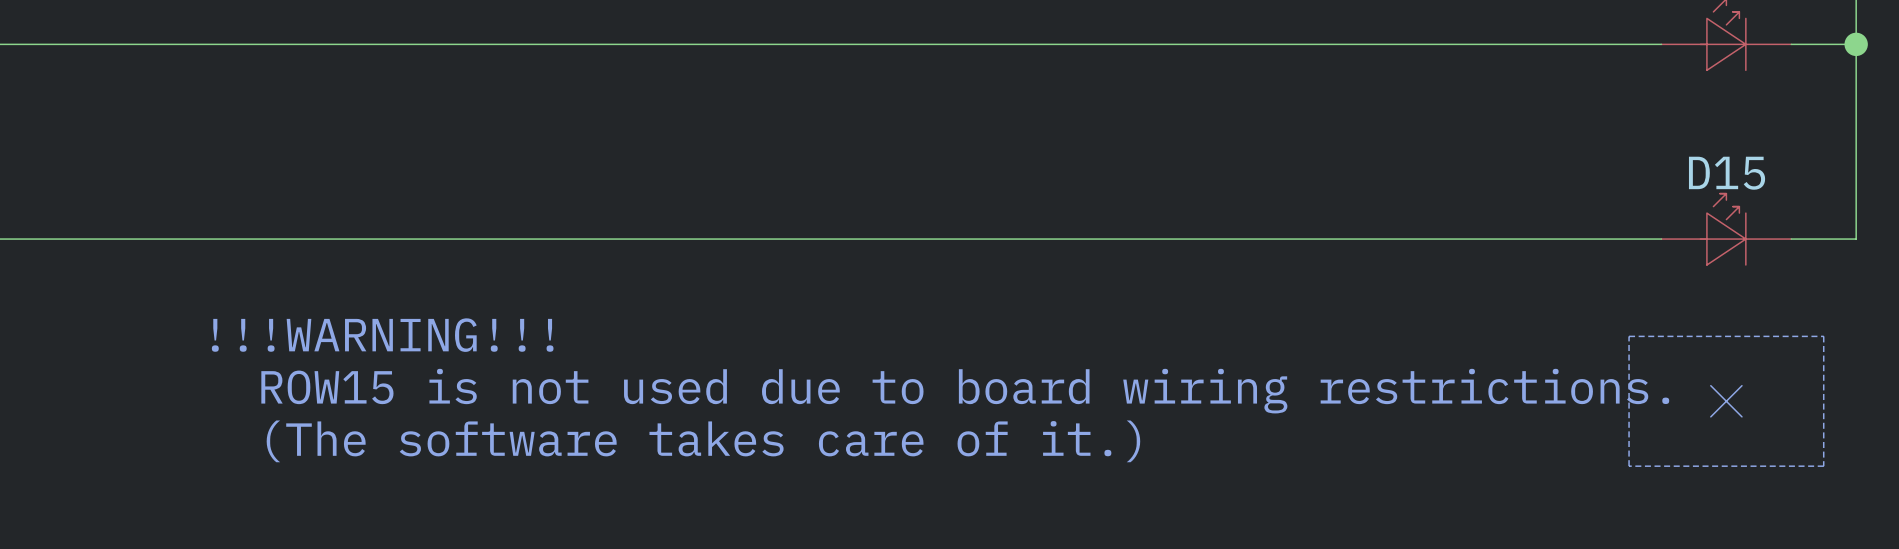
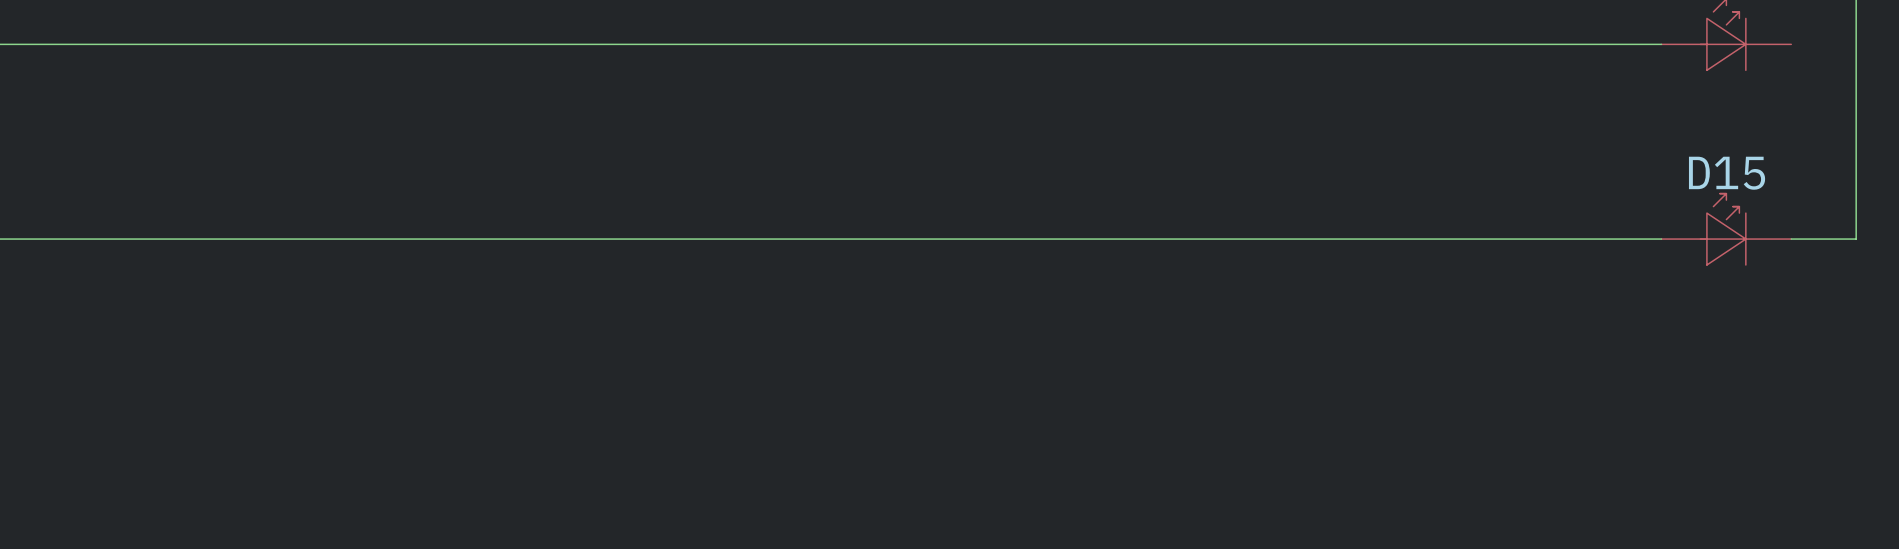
wire: (1791, 44) (1856, 44) -> none
junction: (1856, 44) -> none
text: !!!WARNING!!! (382, 335) -> none
line: (1629, 336) (1823, 336) (1823, 466) (1629, 466) (1629, 336) -> none
text: ROW15 is not used due to board wiring restrictions. (965, 391) -> none
no-connect mark: (1726, 401) -> none
text: (The software takes care of it.) (703, 441) -> none

